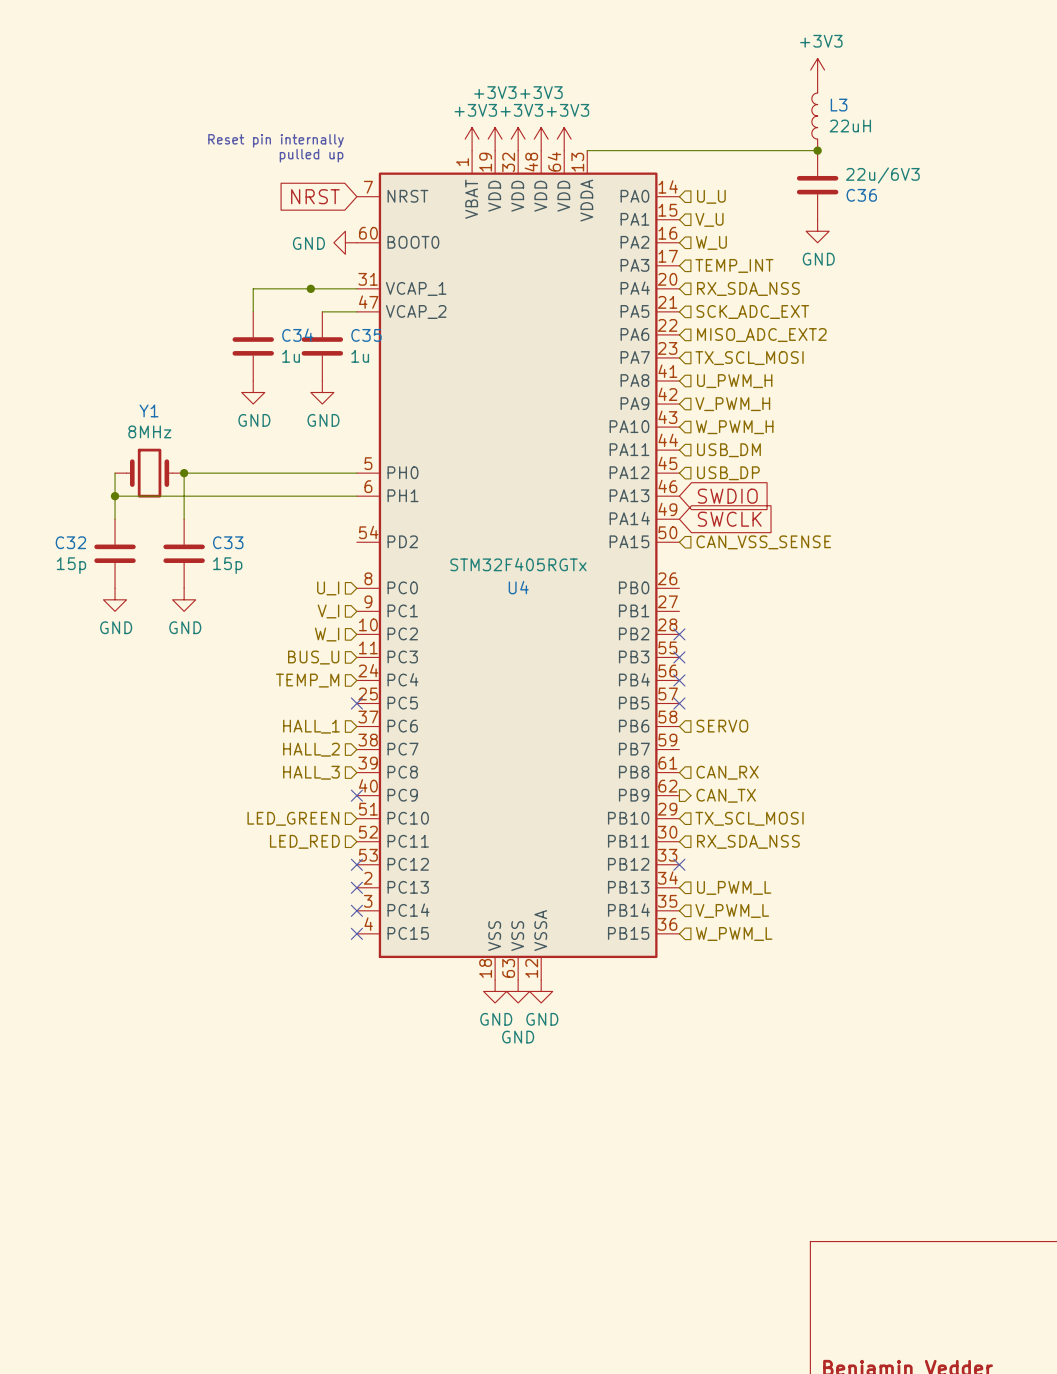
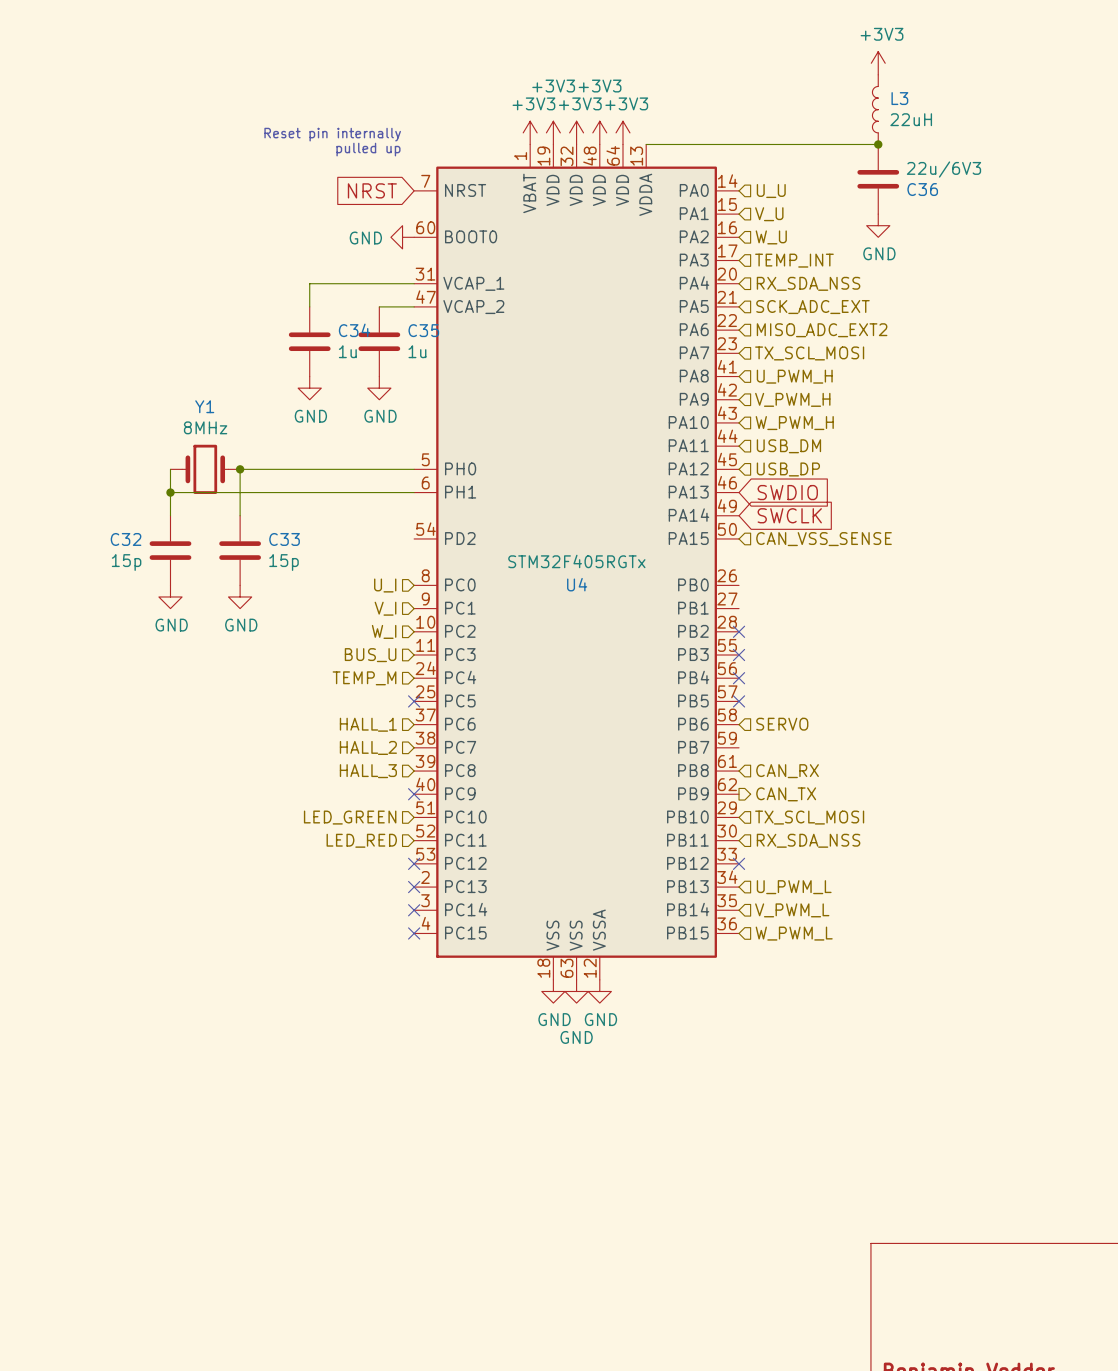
junction: (310, 288) -> none

